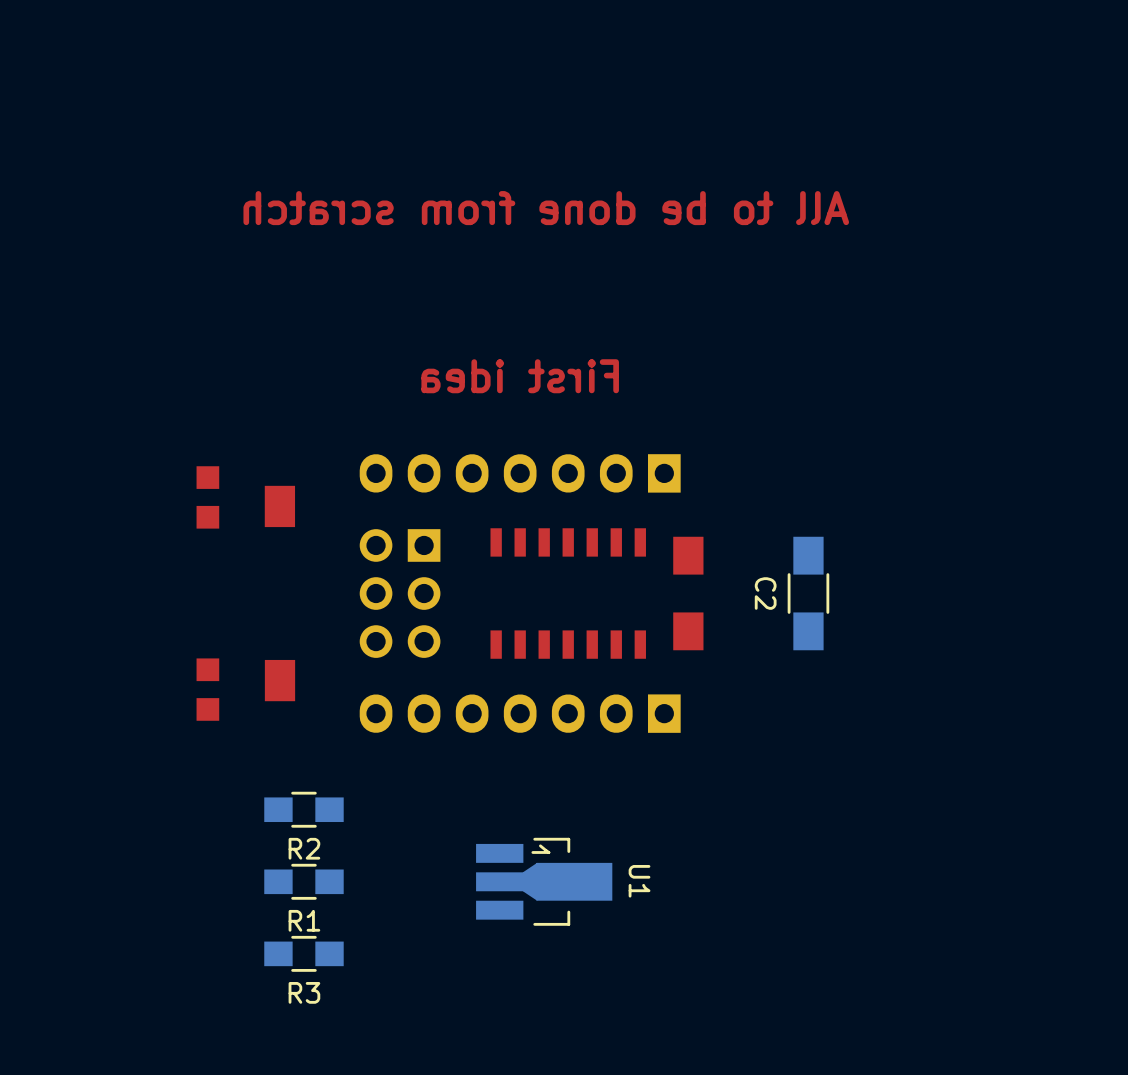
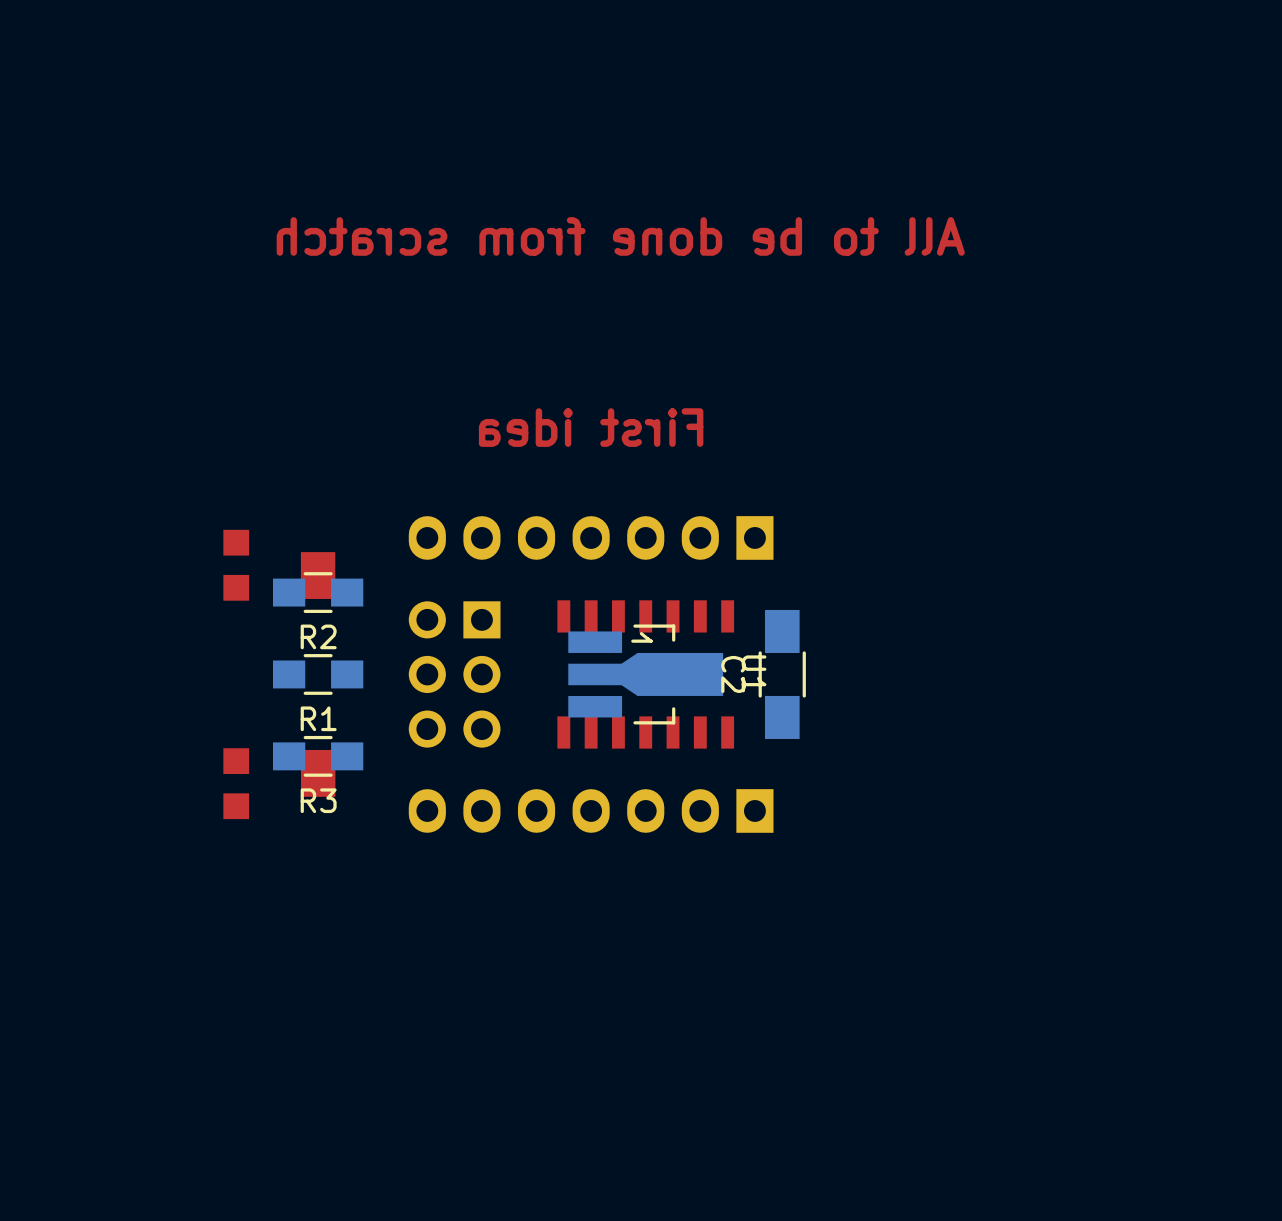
C2 position: (808, 593) -> (782, 674)
R2 position: (303, 809) -> (318, 592)
R1 position: (303, 881) -> (318, 674)
U1 position: (544, 881) -> (645, 674)
R3 position: (303, 953) -> (318, 756)

